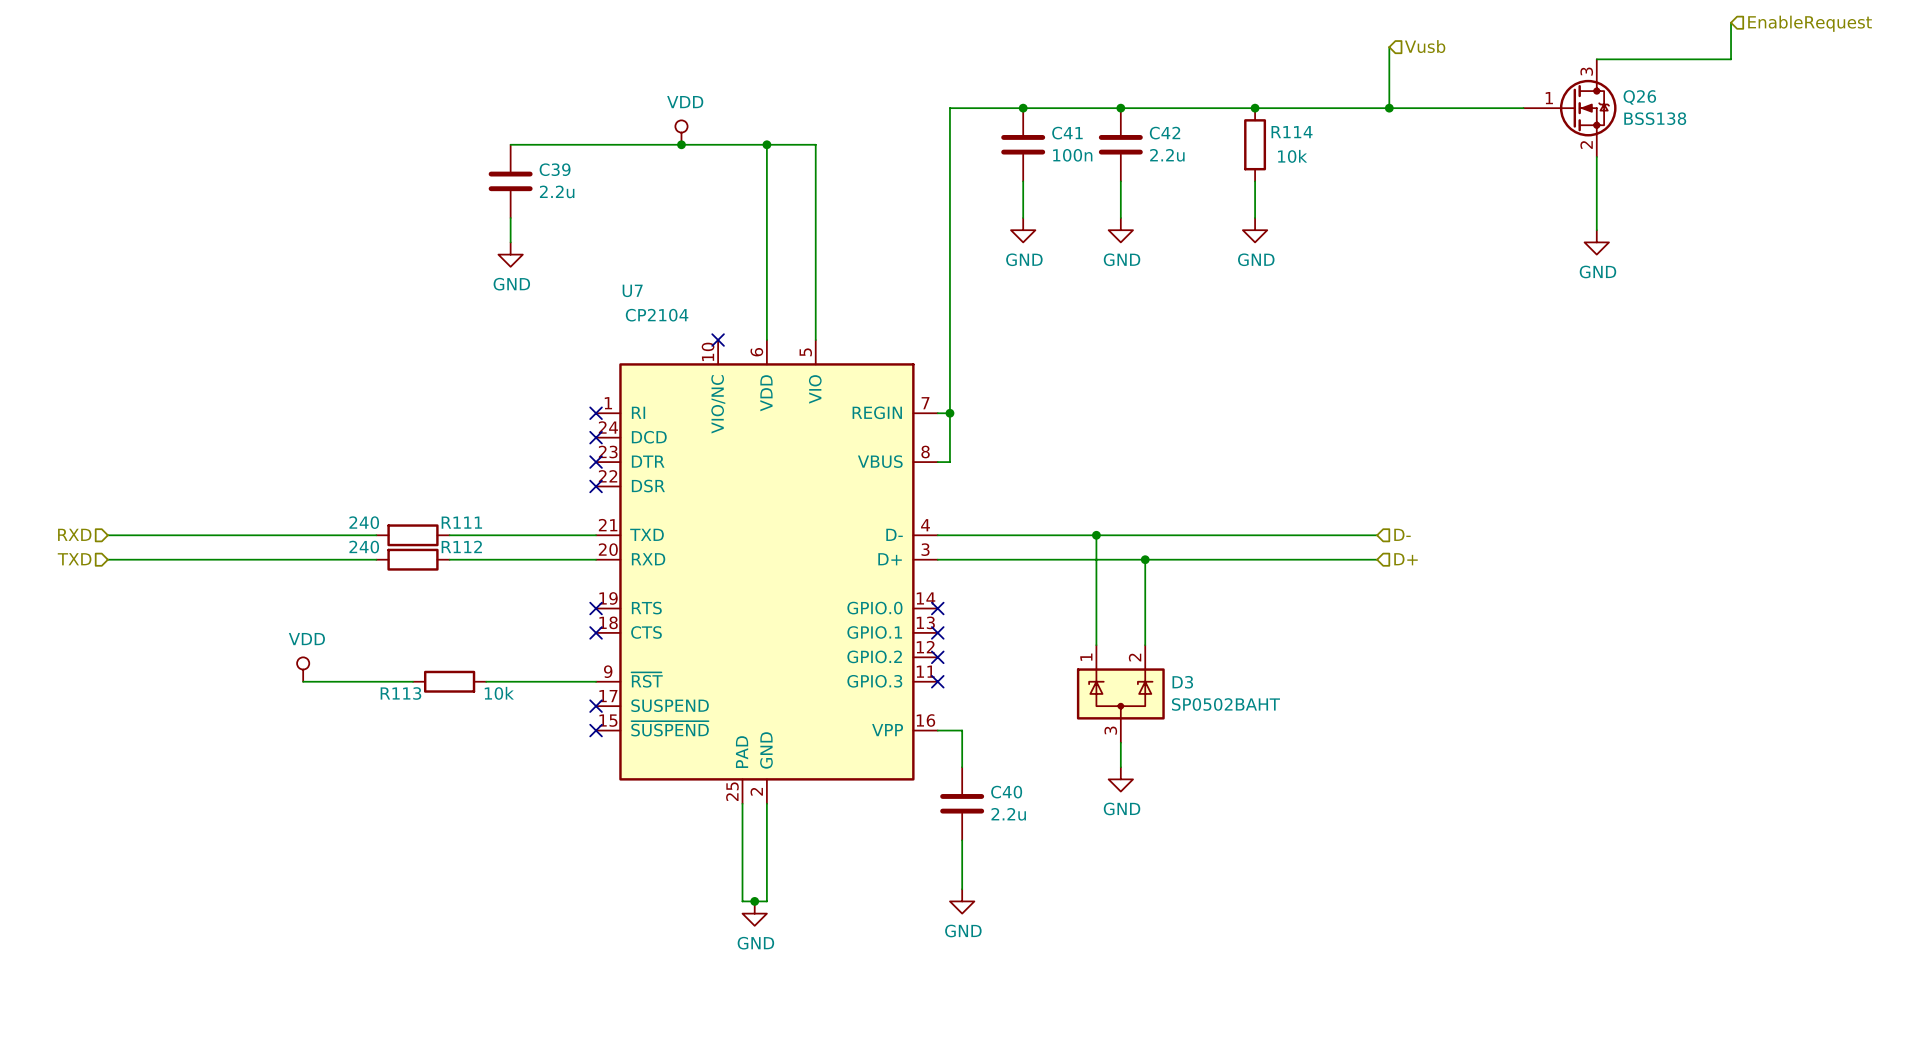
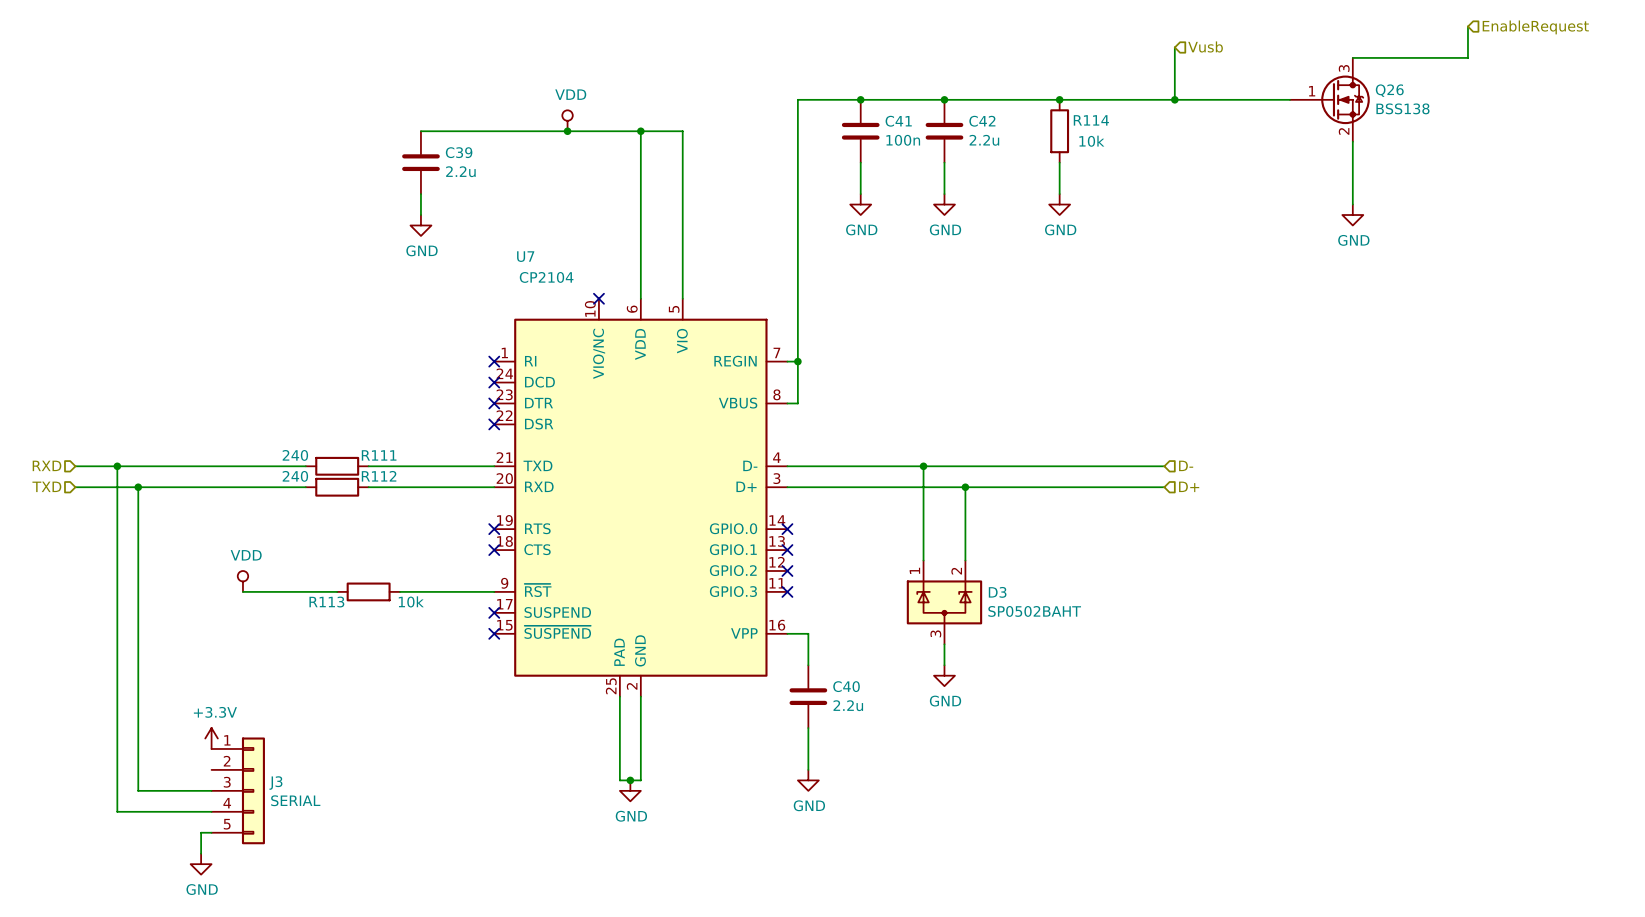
wire: none -> (117, 466) (117, 811) (211, 811)
junction: none -> (117, 466)
wire: none -> (138, 487) (138, 790) (211, 790)
junction: none -> (138, 487)
power symbol: none -> +3.3V (211, 738)
J3: none -> SERIAL (238, 790)
wire: none -> (211, 832) (201, 832) (201, 853)
power symbol: none -> GND (201, 864)

